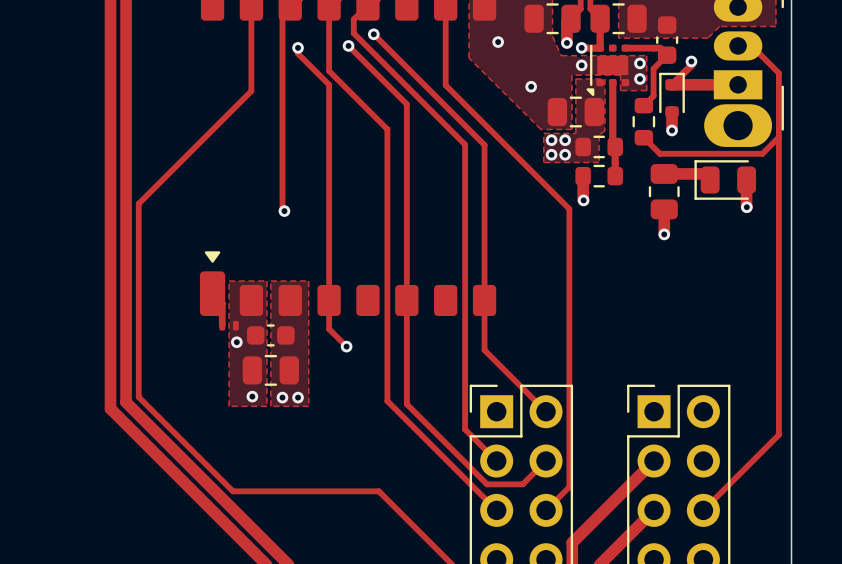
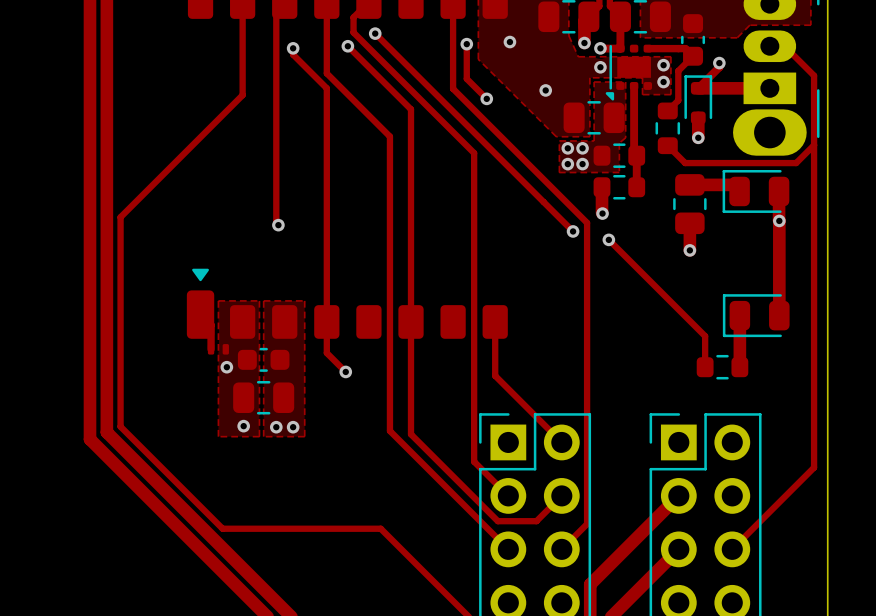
track: none -> (466, 44) (466, 78) (486, 98)
via: none -> (466, 44)
via: none -> (486, 98)
track: (484, 145) (484, 300) -> (495, 153) (573, 231)
track: none -> (779, 220) (779, 315)
via: none -> (573, 231)
track: none -> (608, 239) (705, 336) (705, 367)
via: none -> (608, 239)
track: none -> (739, 315) (739, 367)
part: none -> (756, 315)
part: none -> (722, 367)

